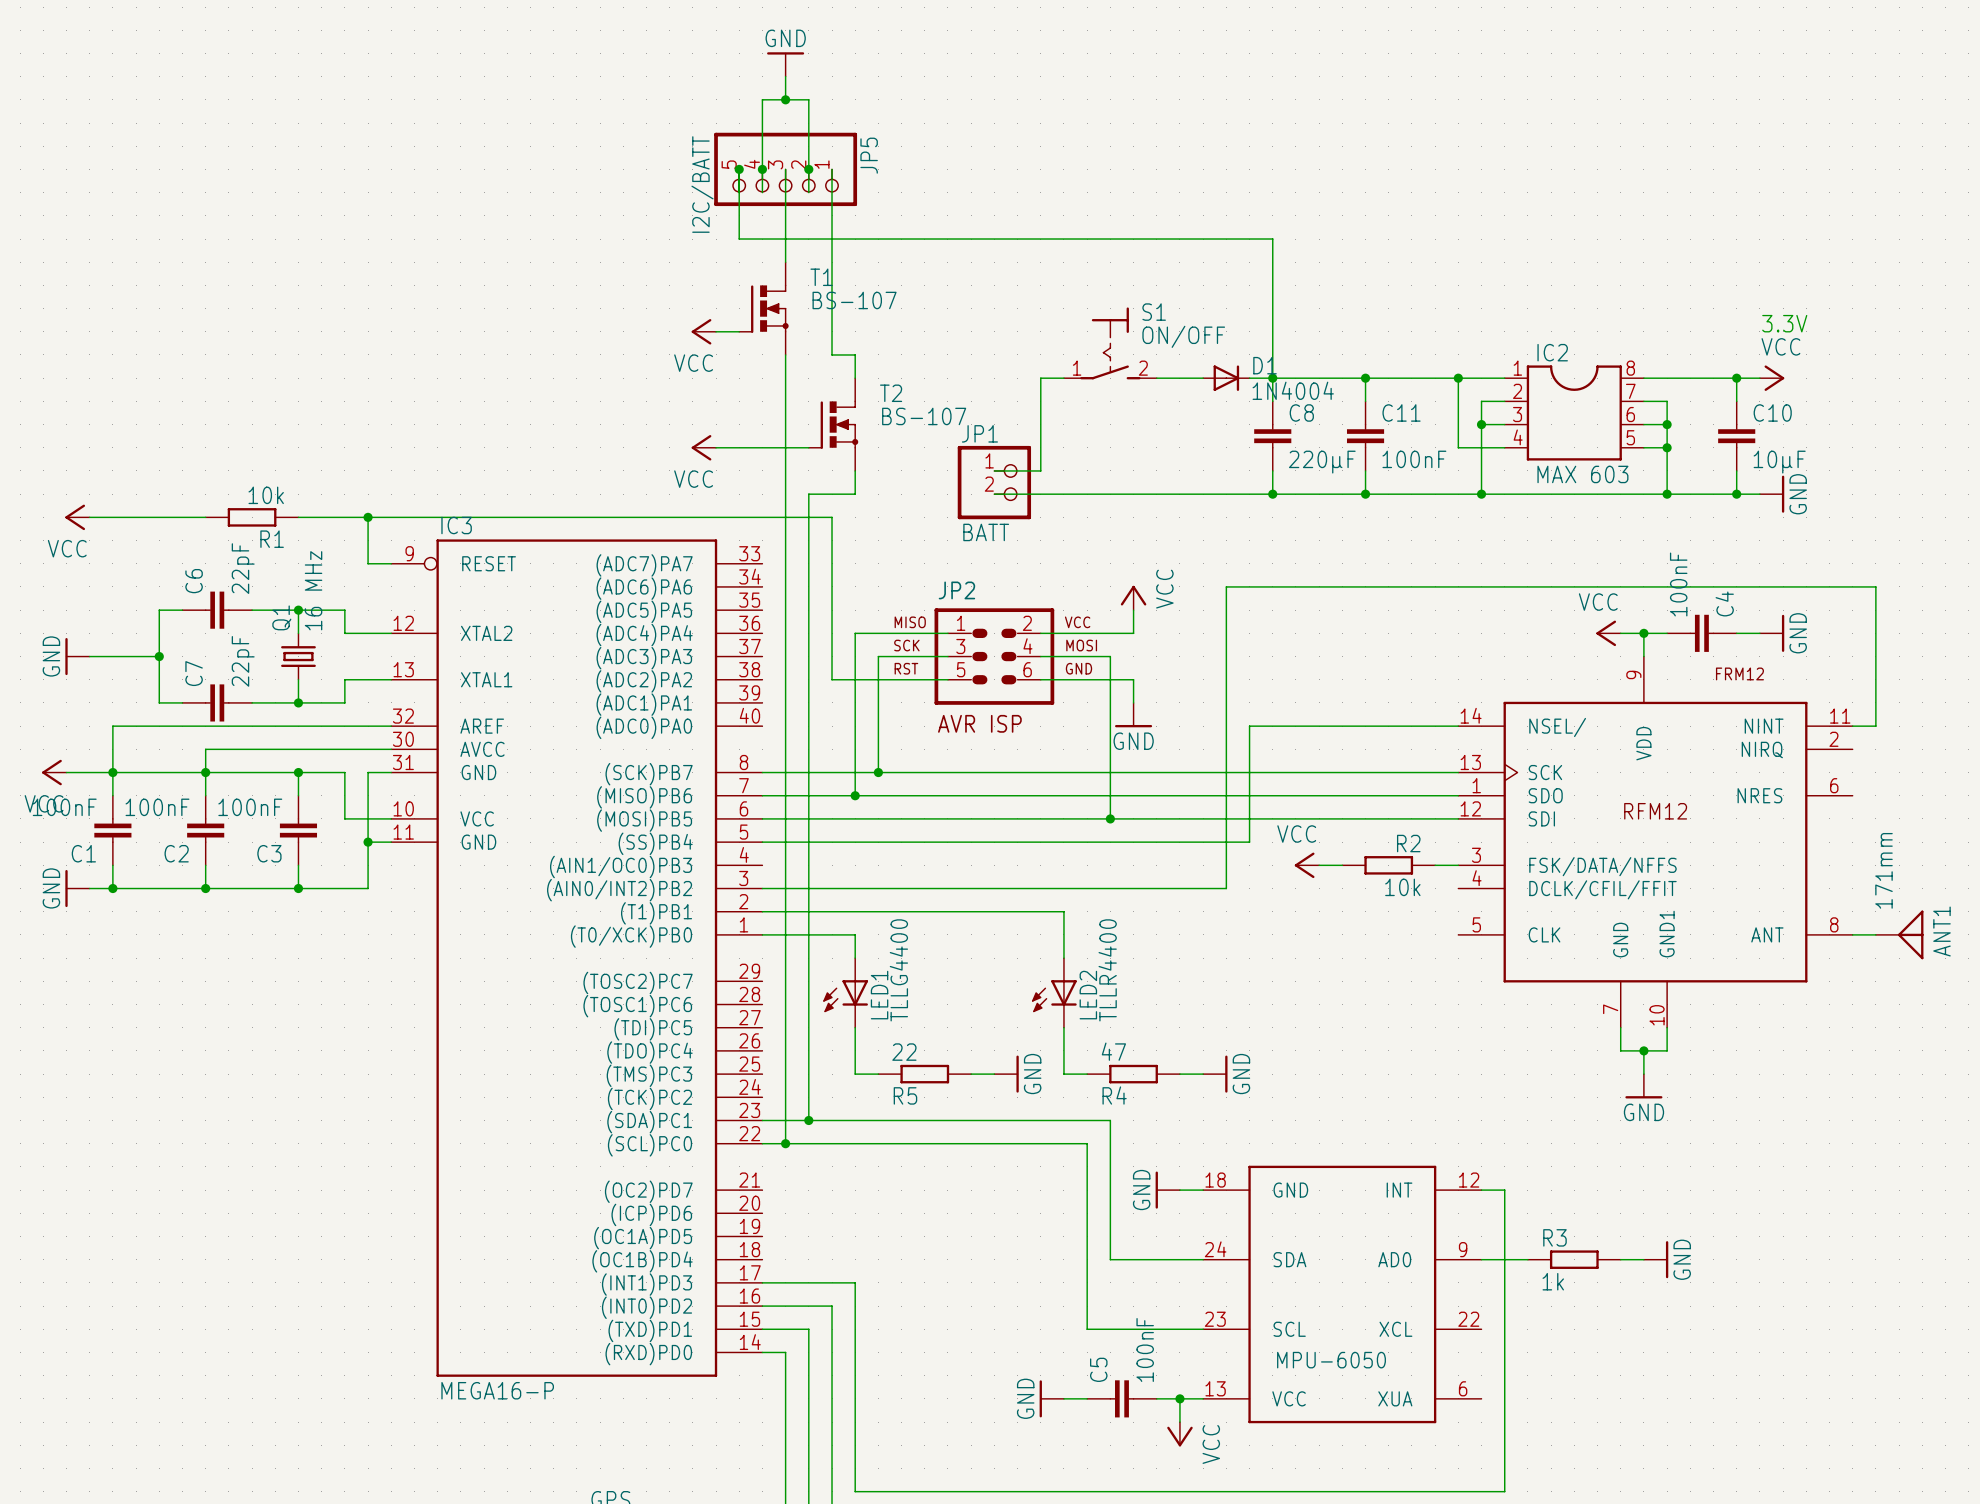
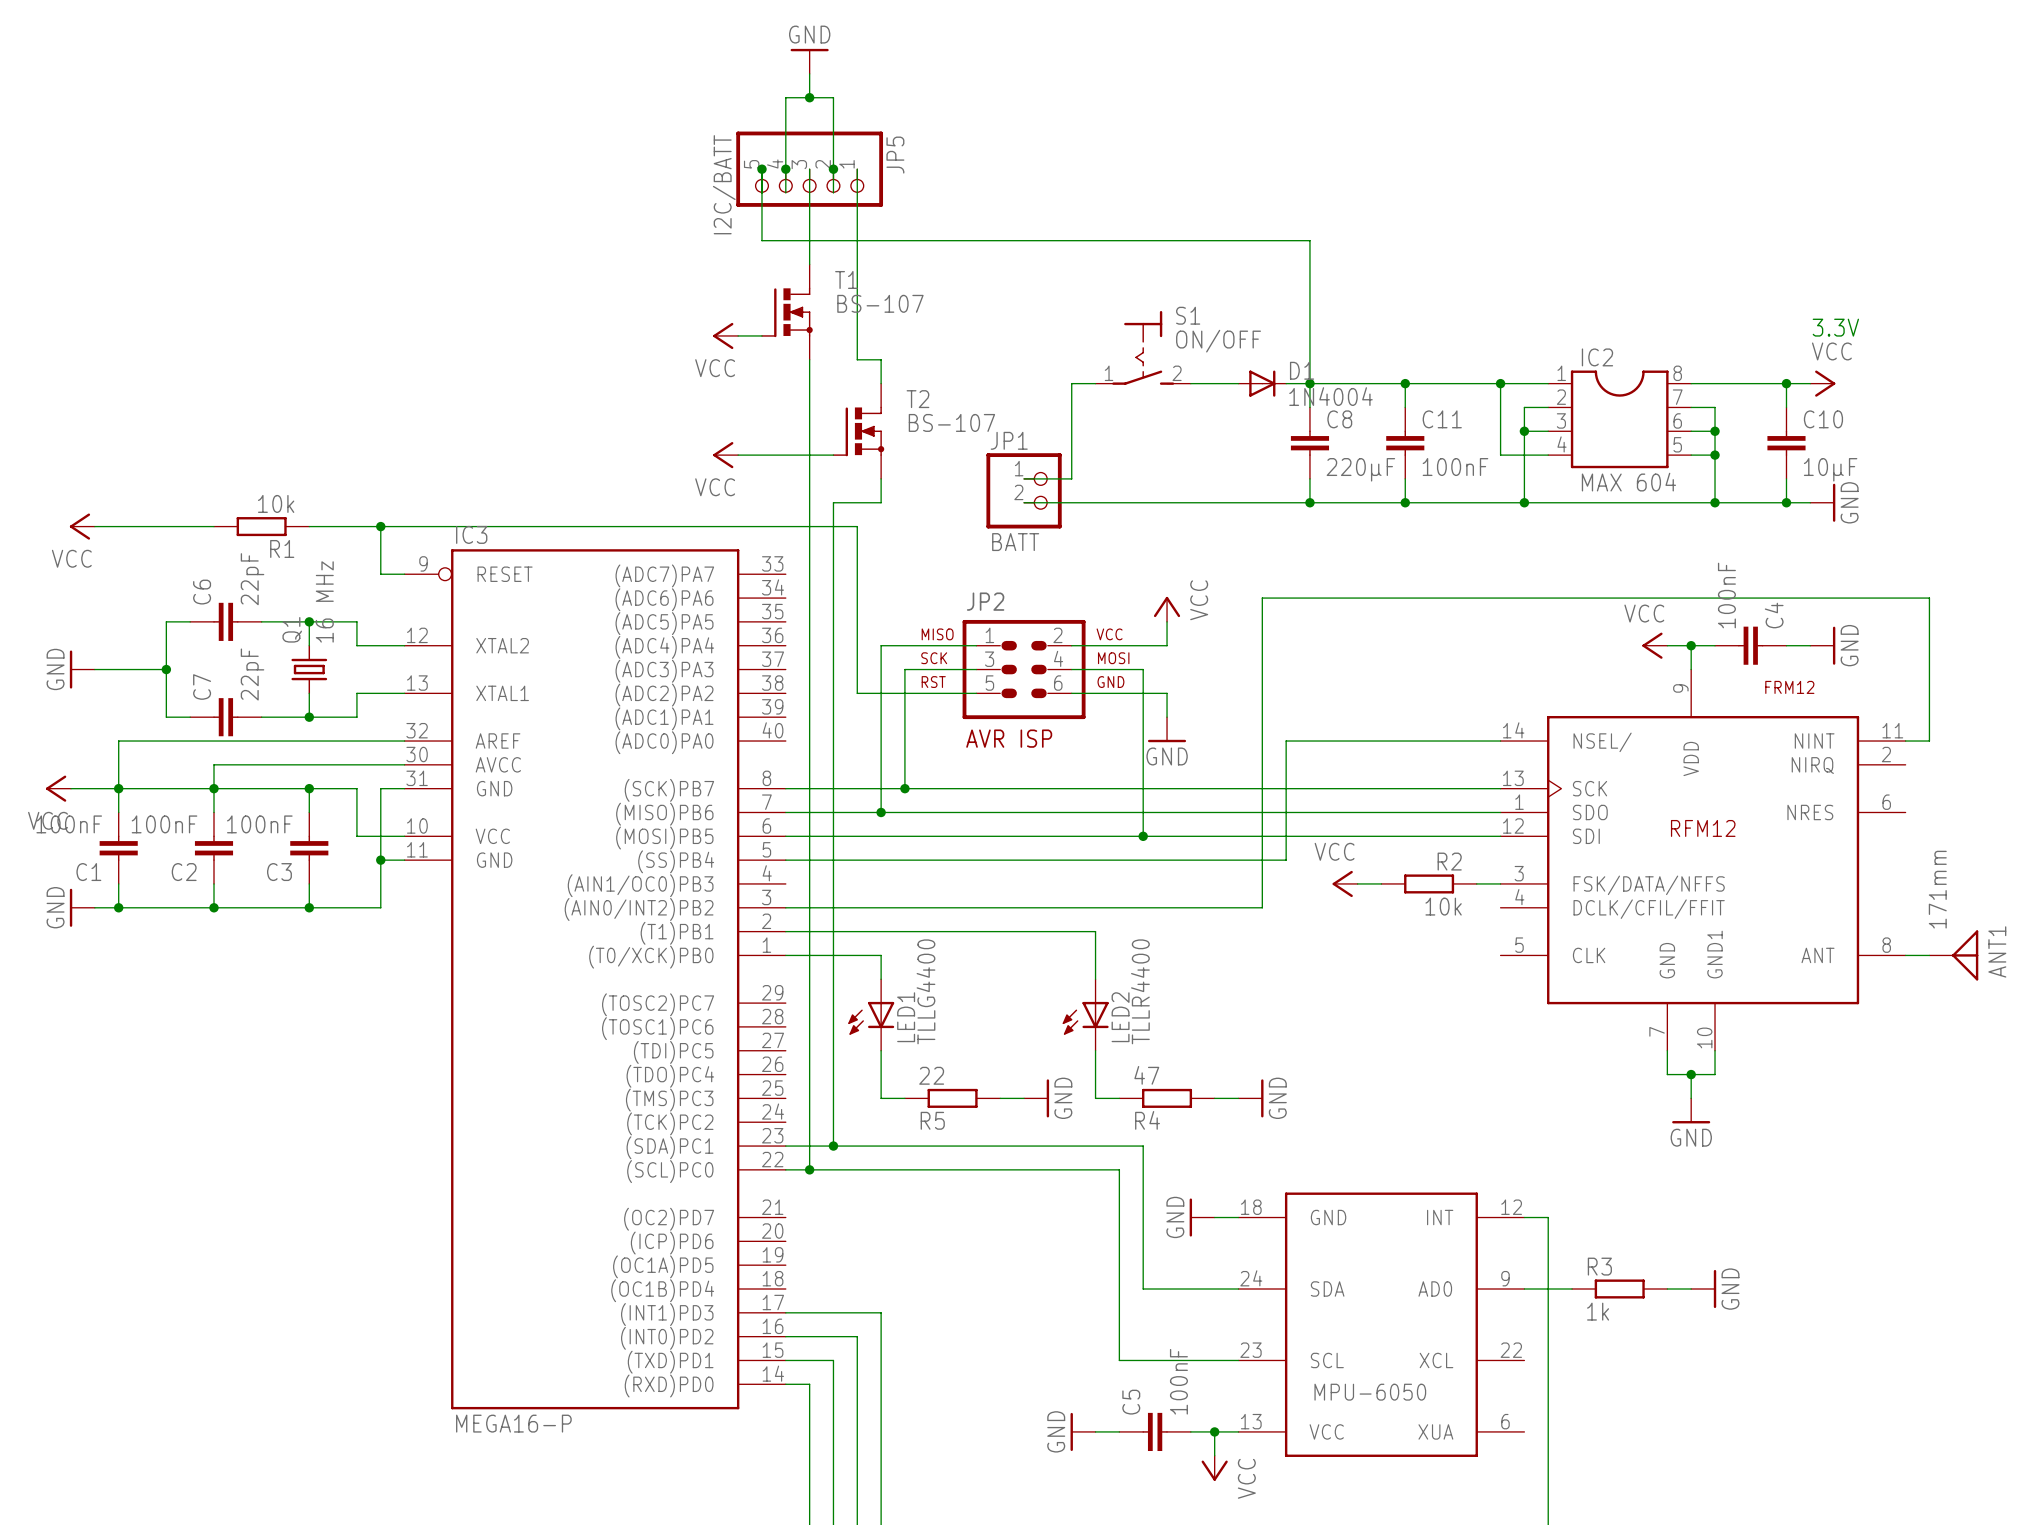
IC2 value: MAX 603 (1582, 474) -> MAX 604 (1628, 482)

